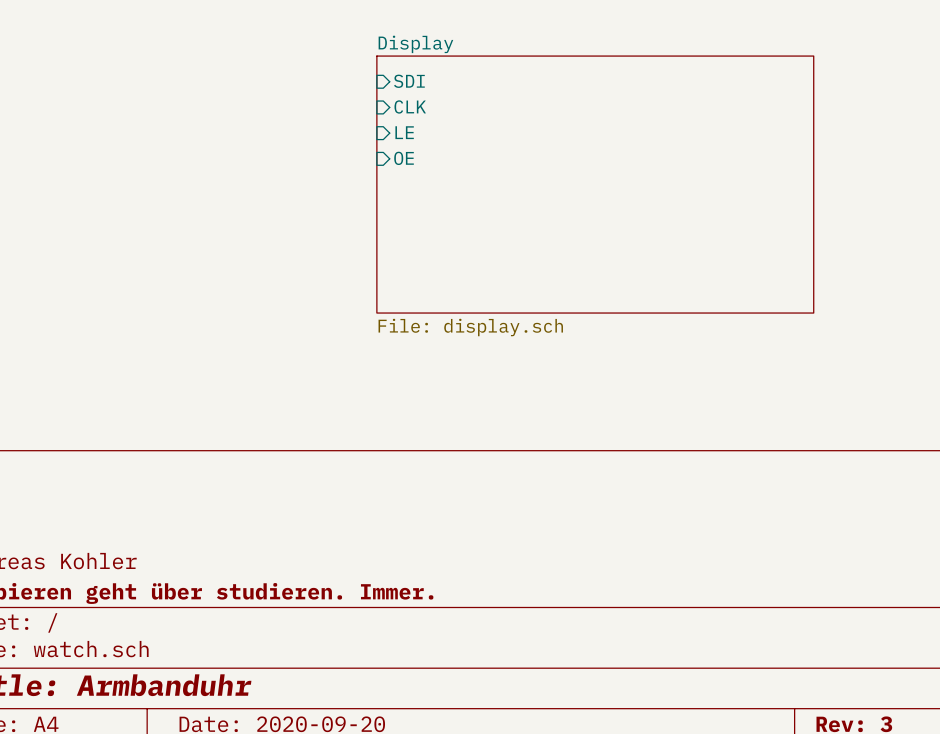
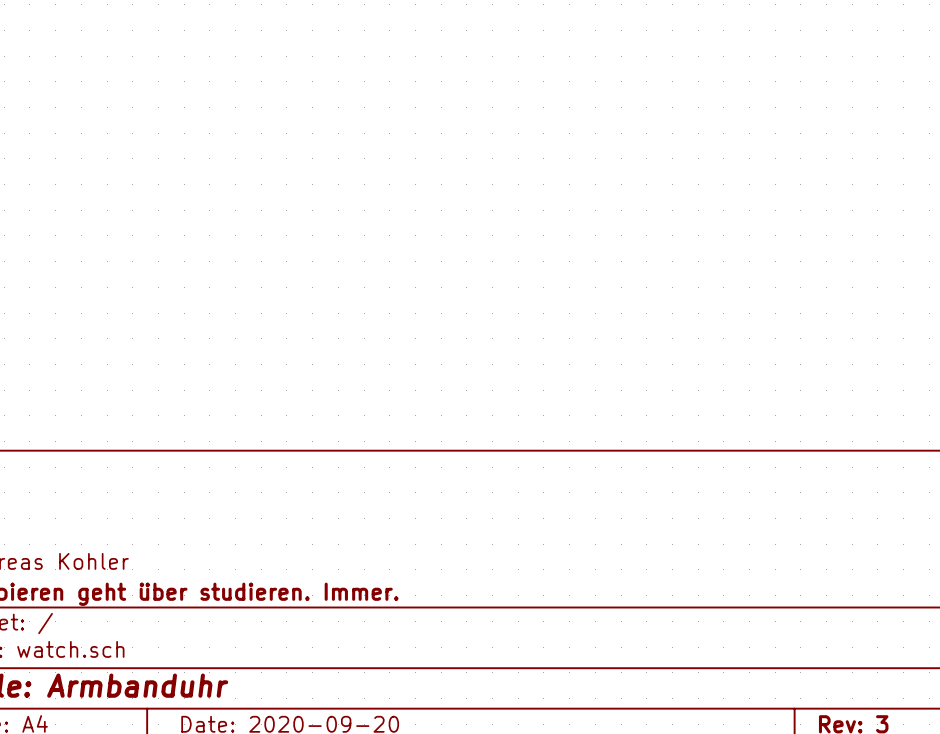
sheet pin: SDI (409, 81) -> none
sheet pin: CLK (410, 106) -> none
sheet pin: LE (404, 132) -> none
sheet pin: OE (404, 158) -> none
sheet Display: File: display.sch (595, 184) -> none

